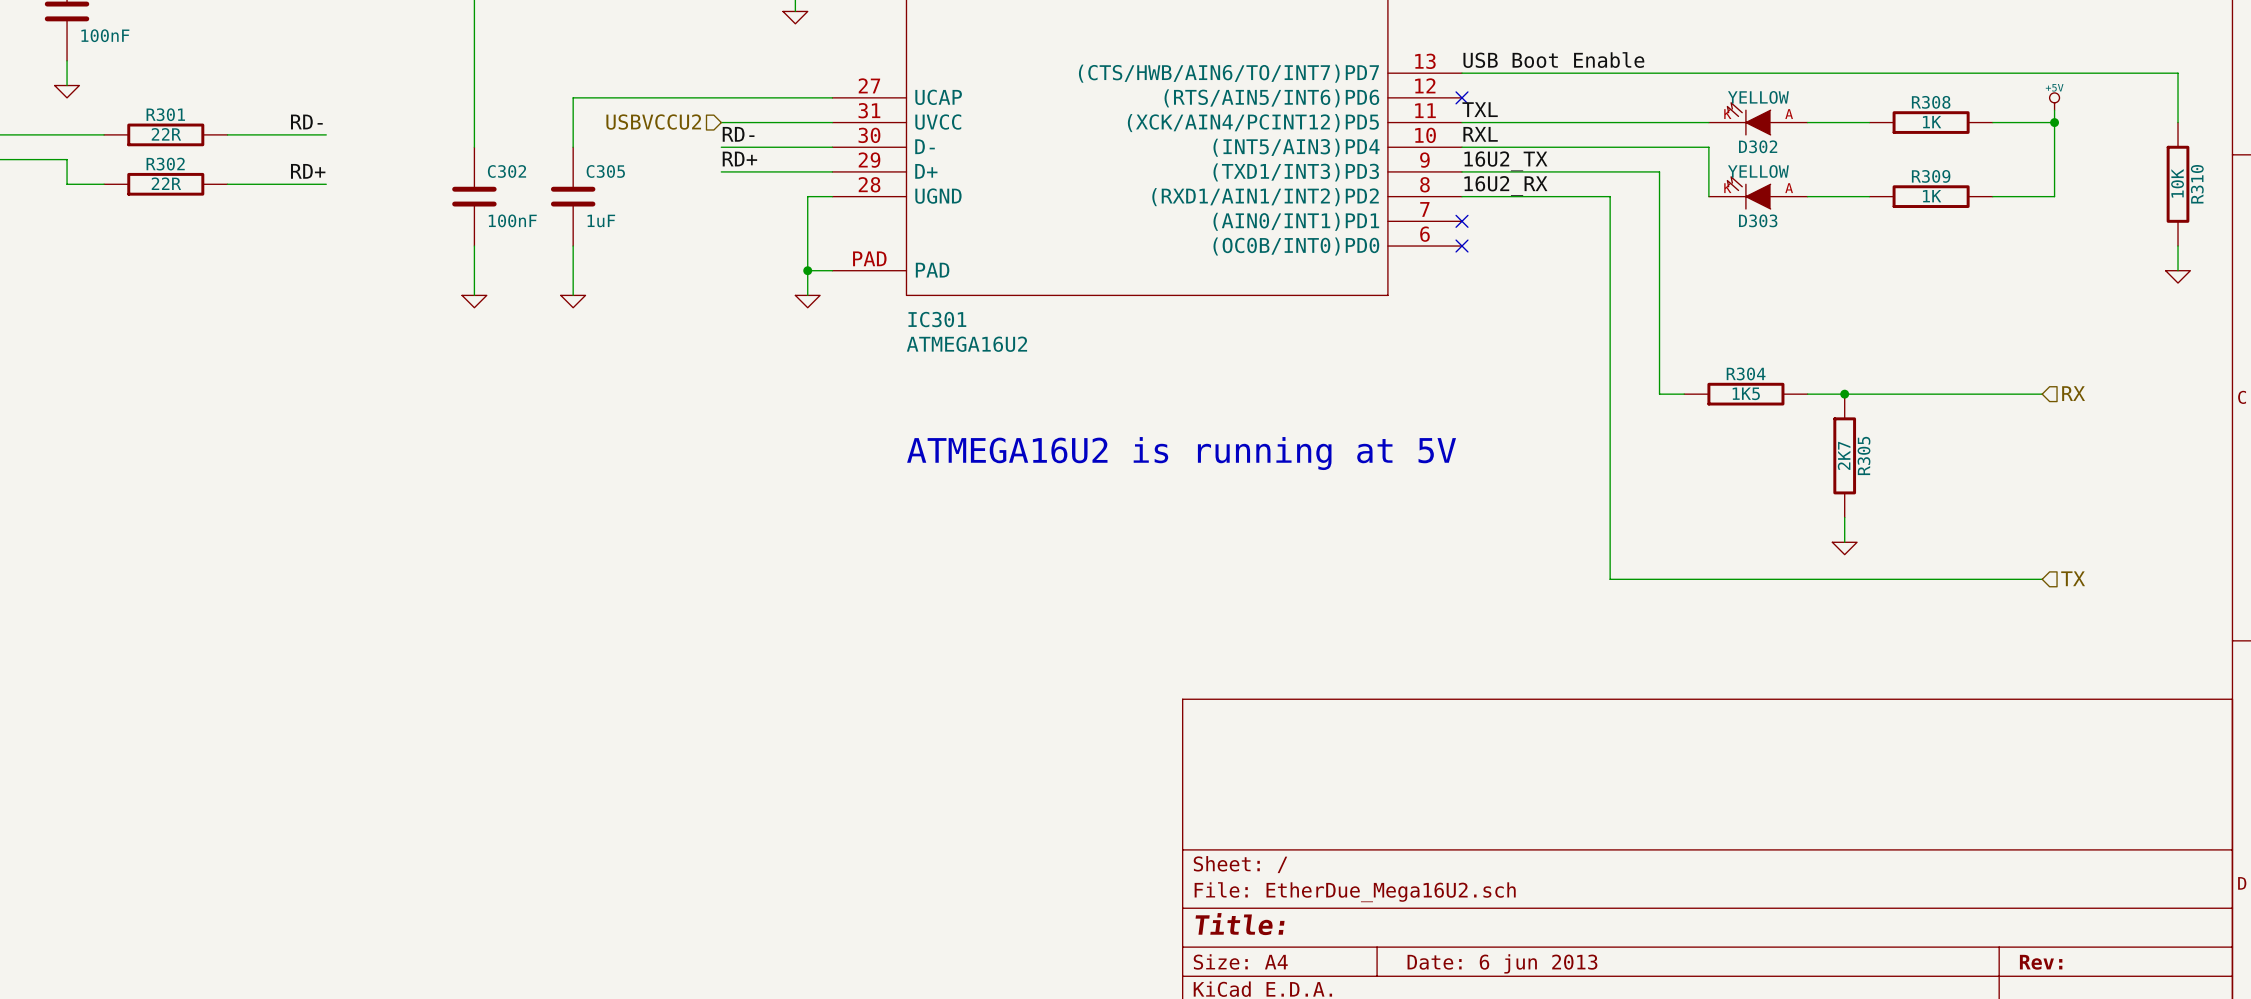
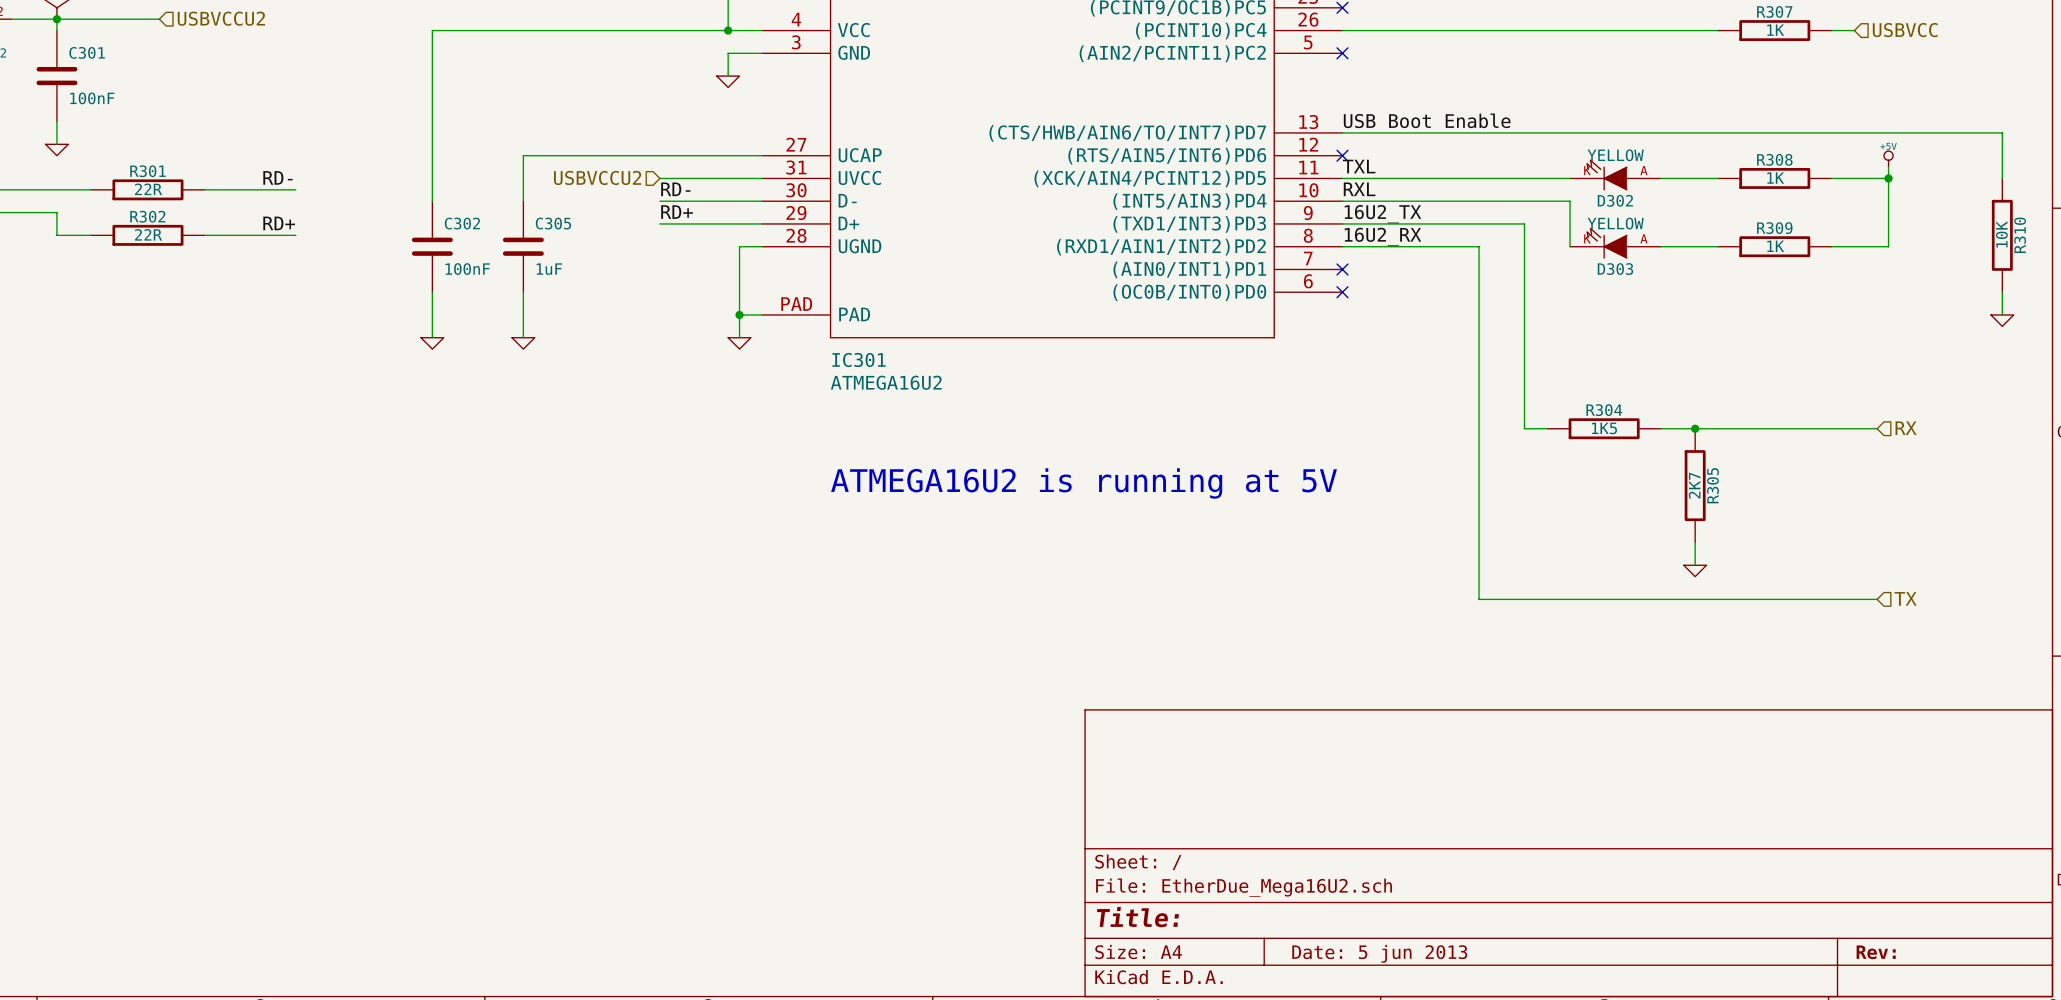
title block: Date: 6 jun 2013 (1502, 963) -> Date: 5 jun 2013 (1379, 953)

